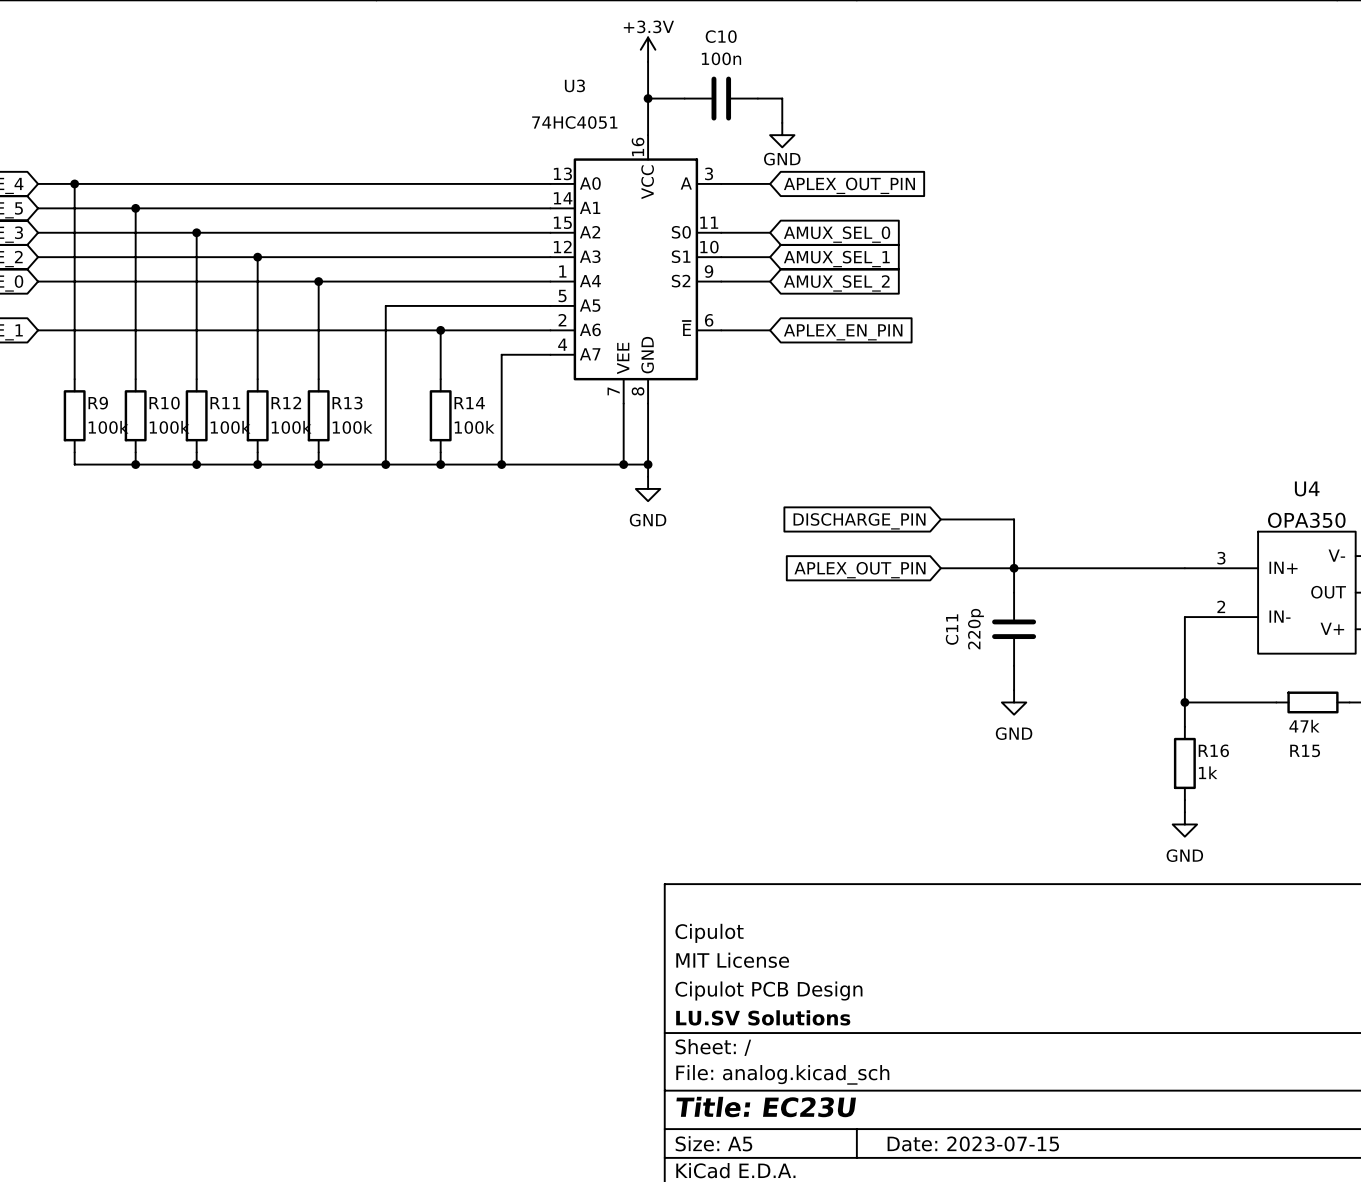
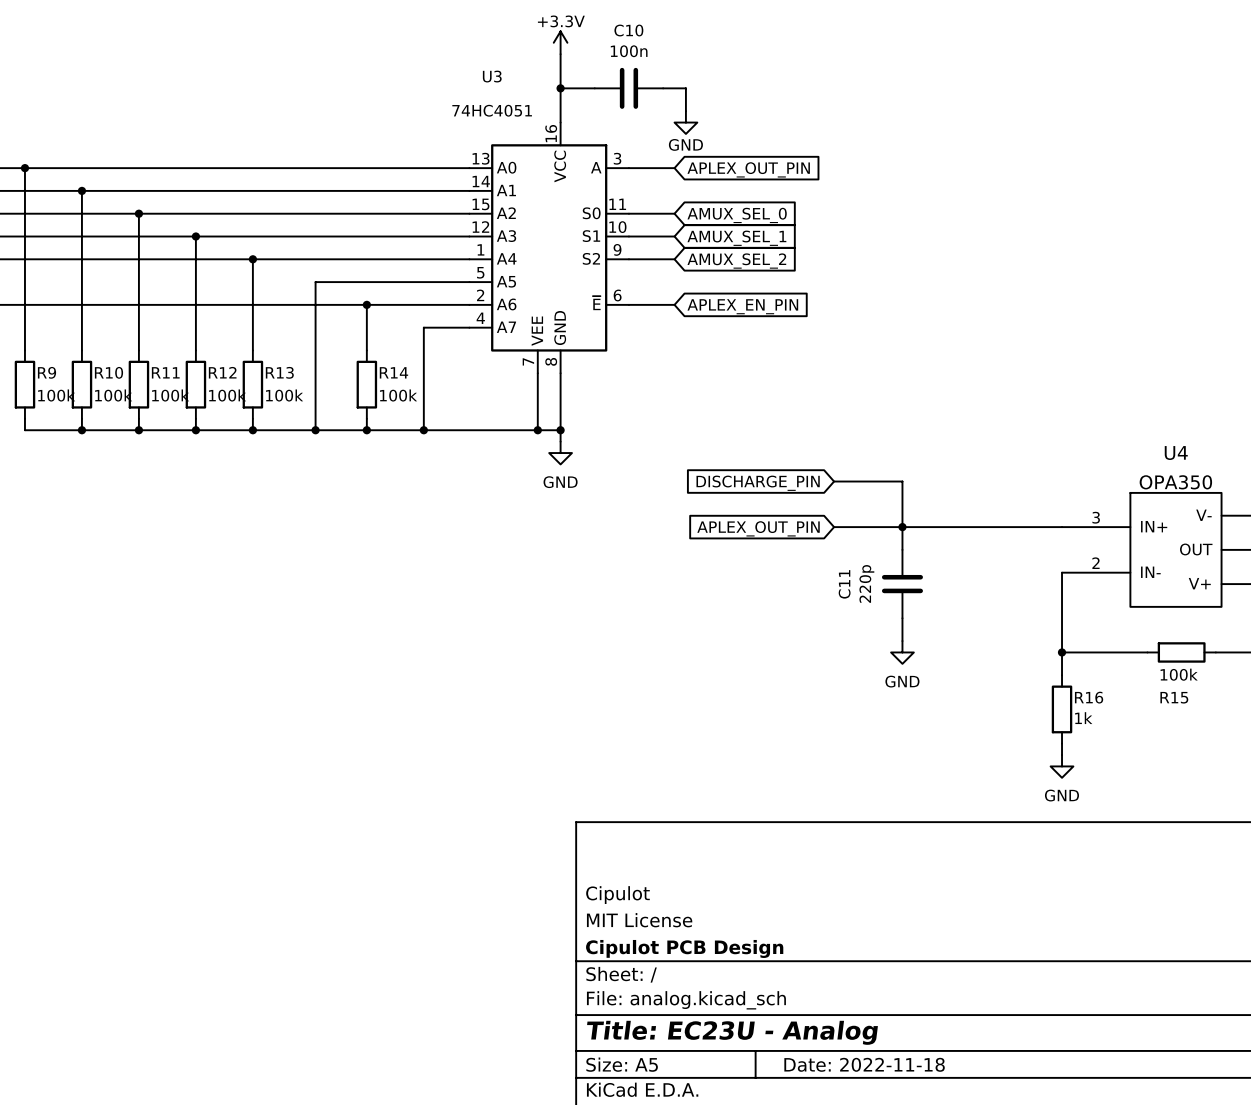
R15 value: 47k (1304, 726) -> 100k (1179, 674)
title block: Cipulot (709, 933) -> none
title block: MIT License (732, 960) -> Cipulot (617, 895)
title block: Cipulot PCB Design (768, 991) -> MIT License (639, 920)
title block: LU.SV Solutions (763, 1017) -> Cipulot PCB Design (684, 948)
title block: Title: EC23U (766, 1107) -> Title: EC23U - Analog (732, 1032)
title block: Date: 2023-07-15 (973, 1143) -> Date: 2022-11-18 (864, 1064)

